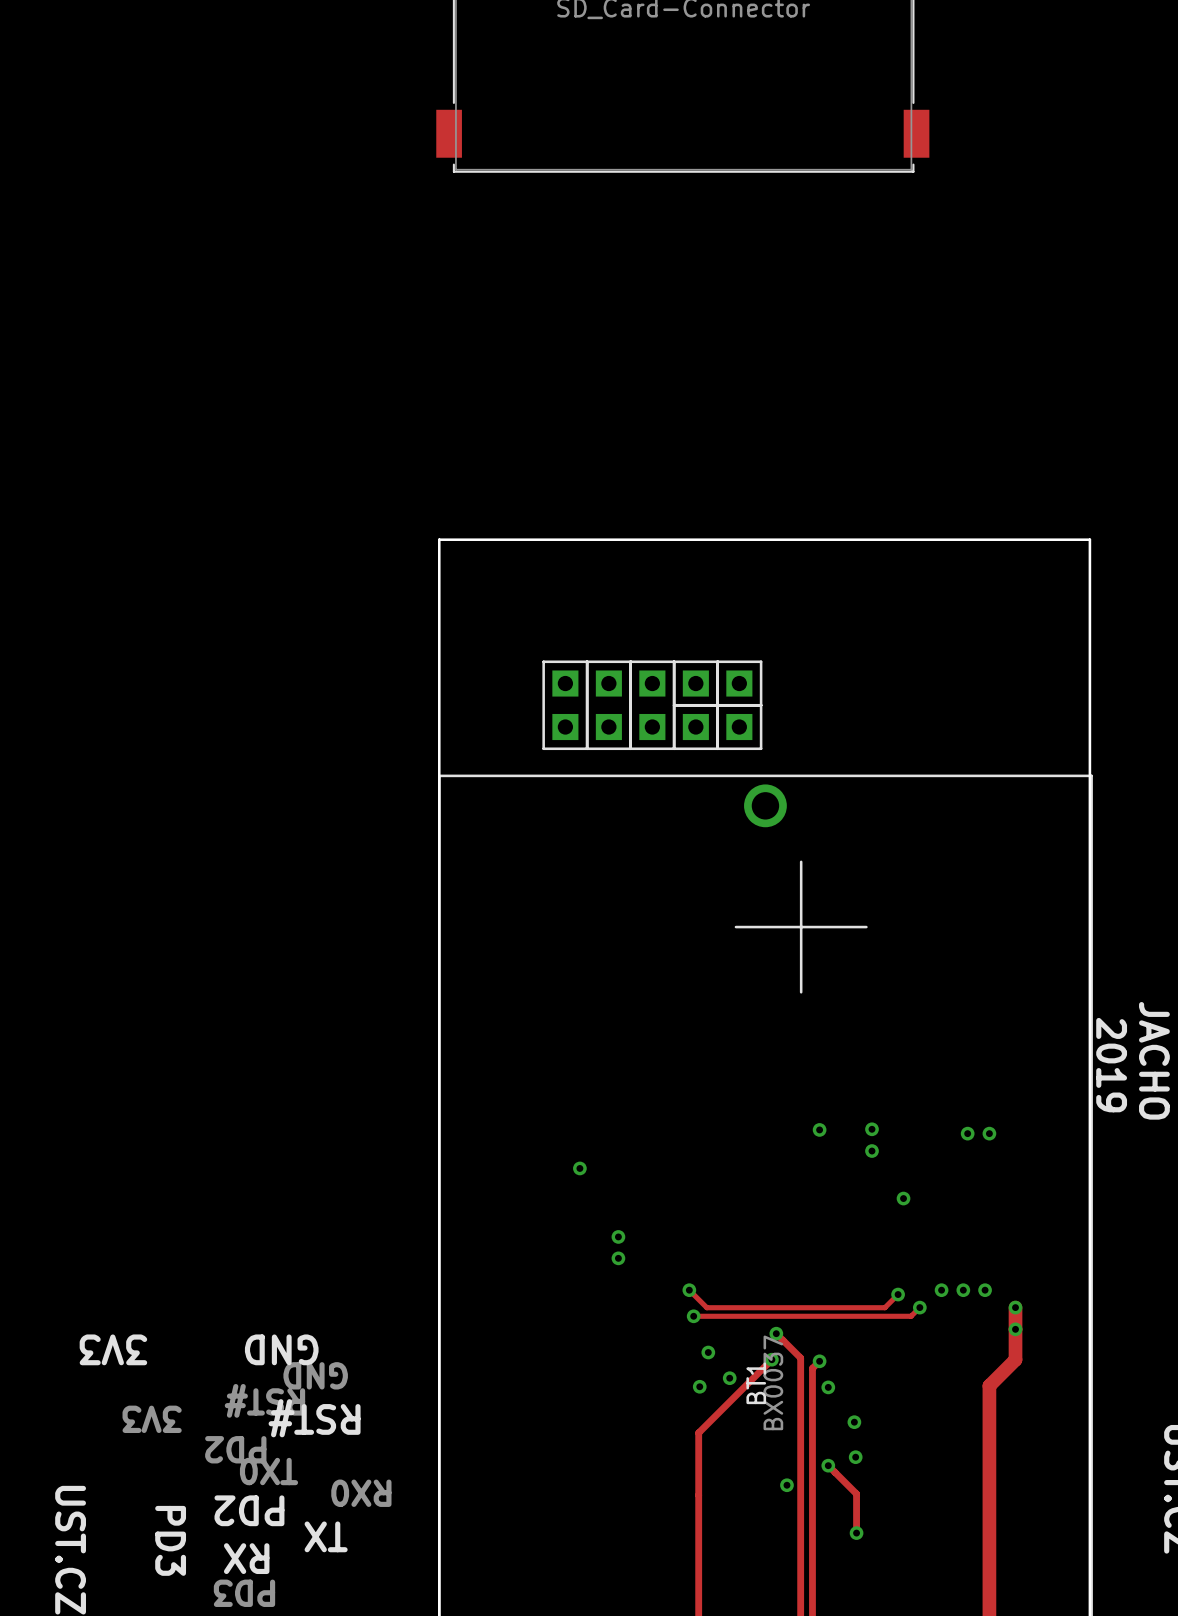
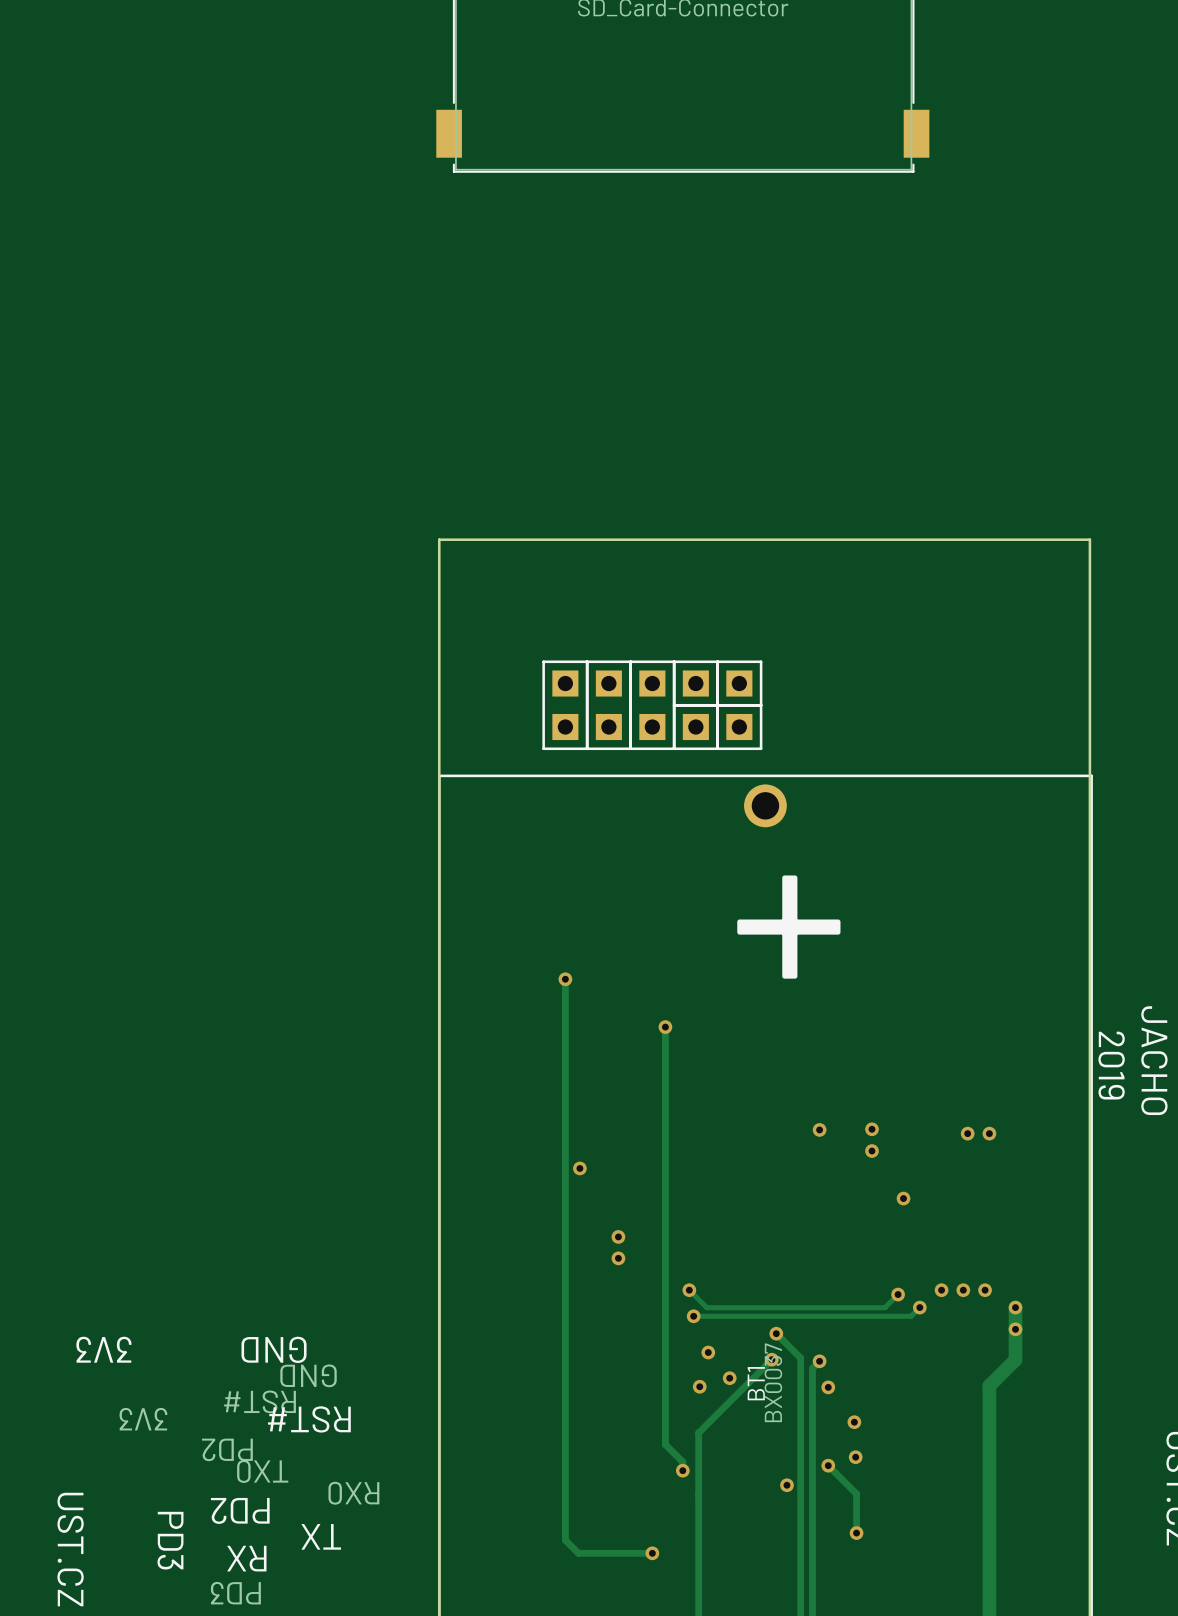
track: none -> (565, 979) (565, 1540) (578, 1553) (652, 1553)
via: none -> (565, 979)
track: none -> (665, 1027) (665, 1444) (682, 1461) (682, 1470)
via: none -> (665, 1027)
via: none -> (682, 1470)
via: none -> (652, 1553)

